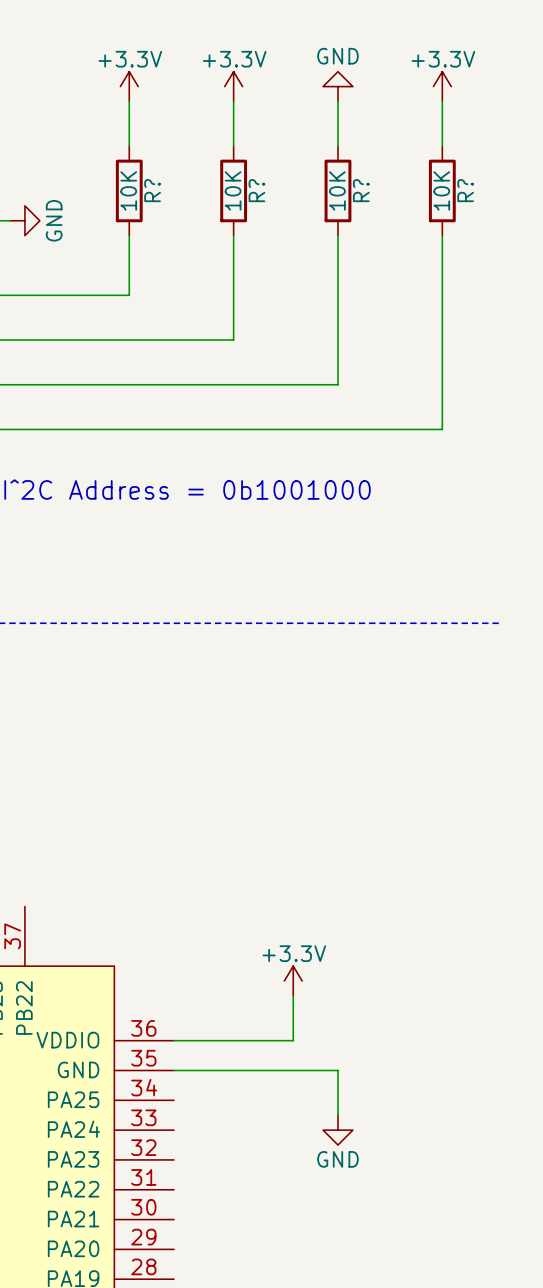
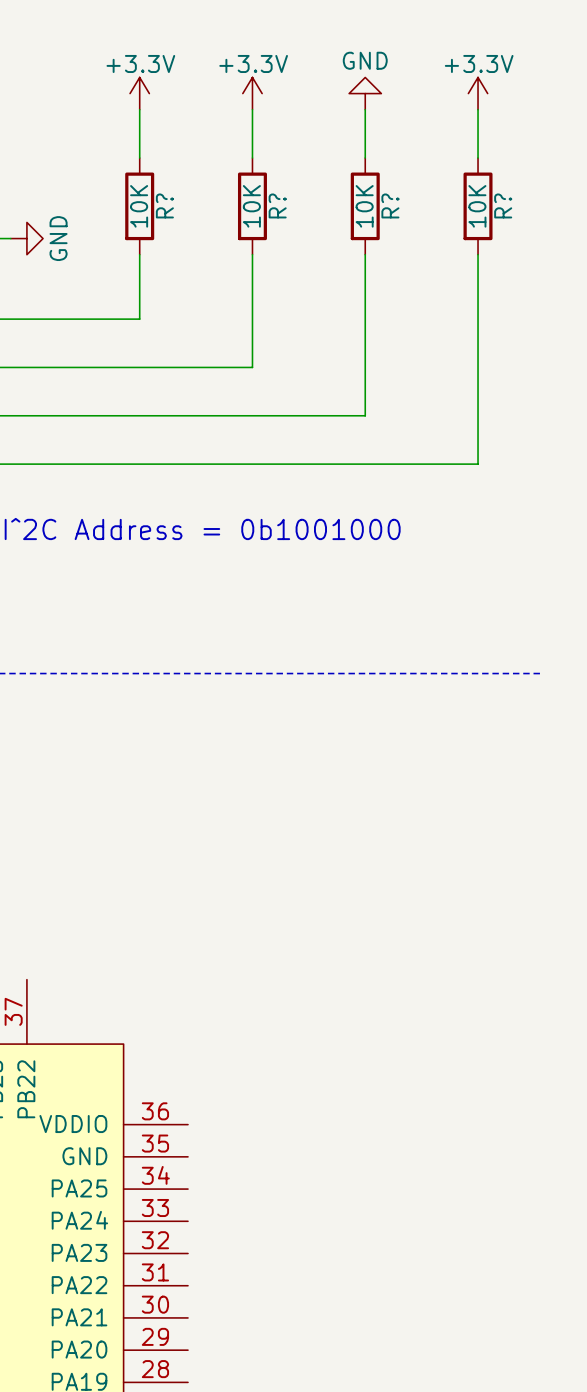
power symbol: +3.3V (293, 981) -> none
wire: (293, 995) (293, 1040) (174, 1040) -> none
wire: (174, 1070) (337, 1070) (337, 1115) -> none
power symbol: GND (337, 1130) -> none

